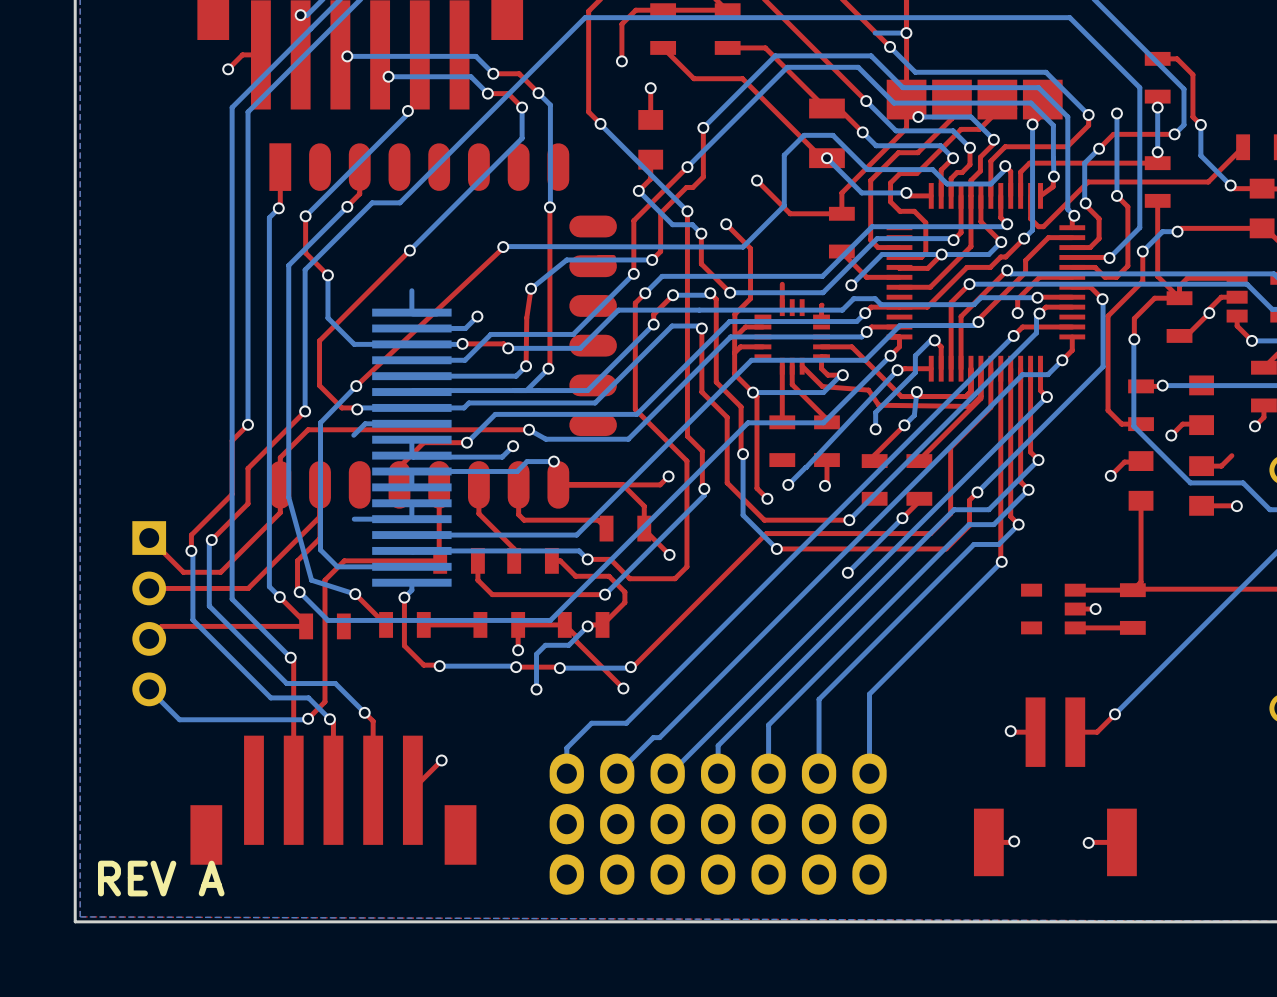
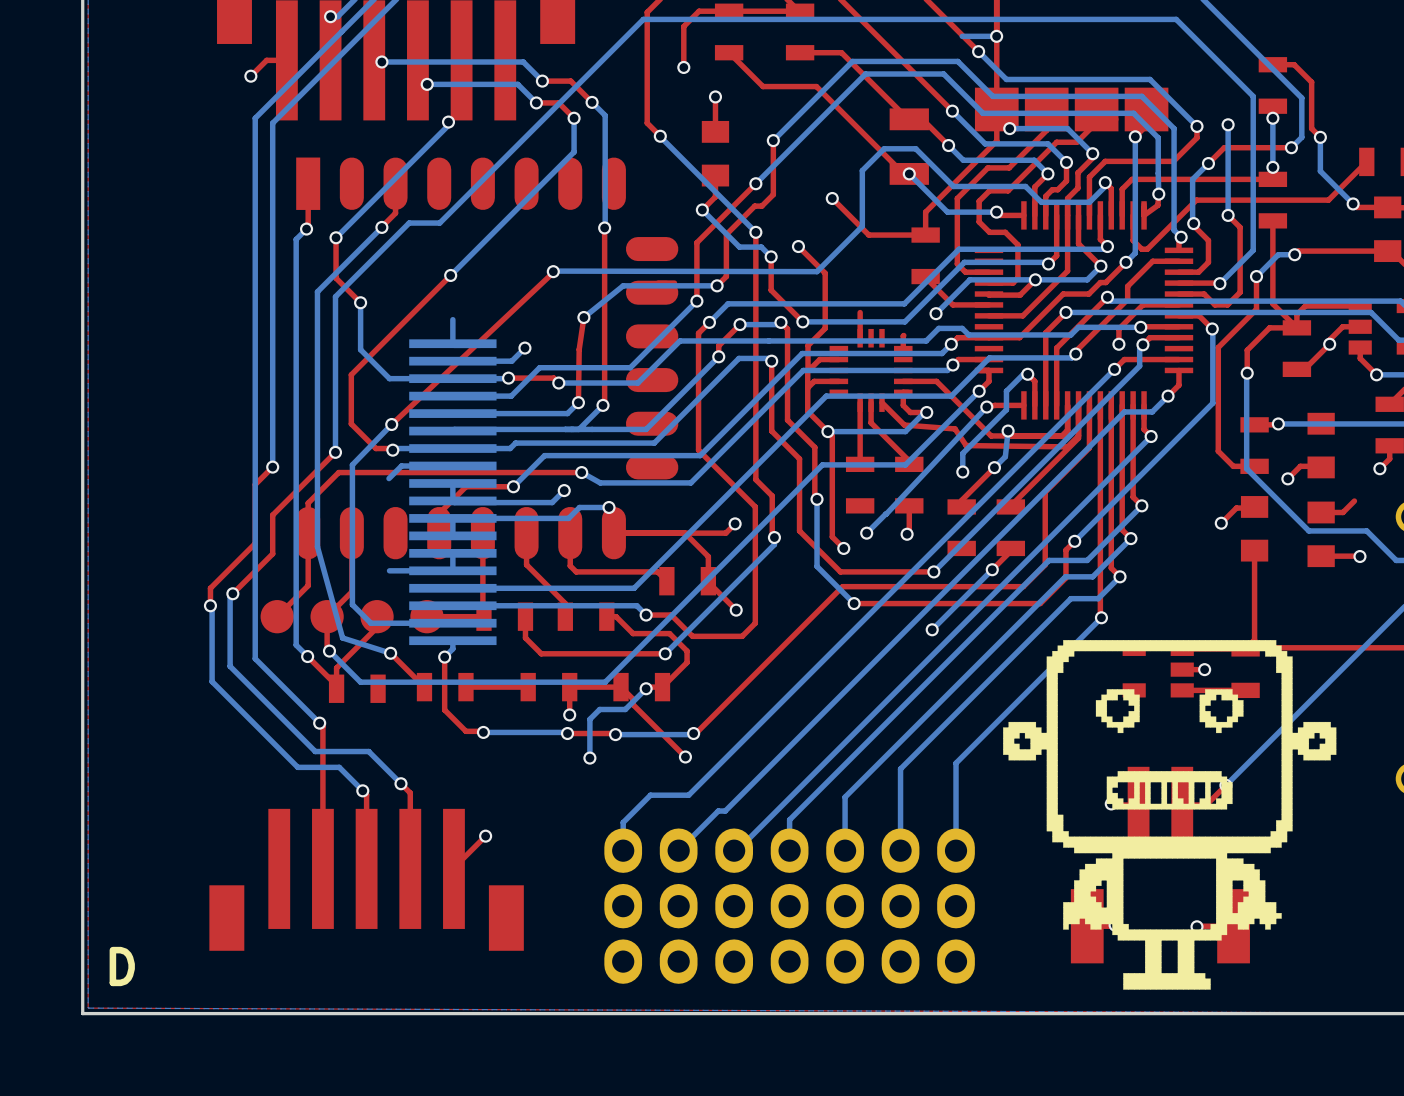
top track: (280, 512) (220, 572) (183, 572) (149, 538) -> (308, 563) (308, 585) (277, 616)
top track: (320, 516) (248, 588) (149, 588) -> none
part: none -> (352, 616)
top track: none -> (377, 616) (377, 627) (336, 668) (336, 685)
top track: (388, 560) (344, 560) (324, 580) (324, 701) (308, 718) -> none
drawing: none -> [1003, 640, 1337, 990]
part: (149, 613) -> none
top track: (306, 626) (161, 626) (149, 638) -> none
bottom track: (149, 689) (179, 719) (308, 718) -> none
via: (308, 718) -> none
text: REV A (161, 878) -> none
text: none -> D (122, 966)

